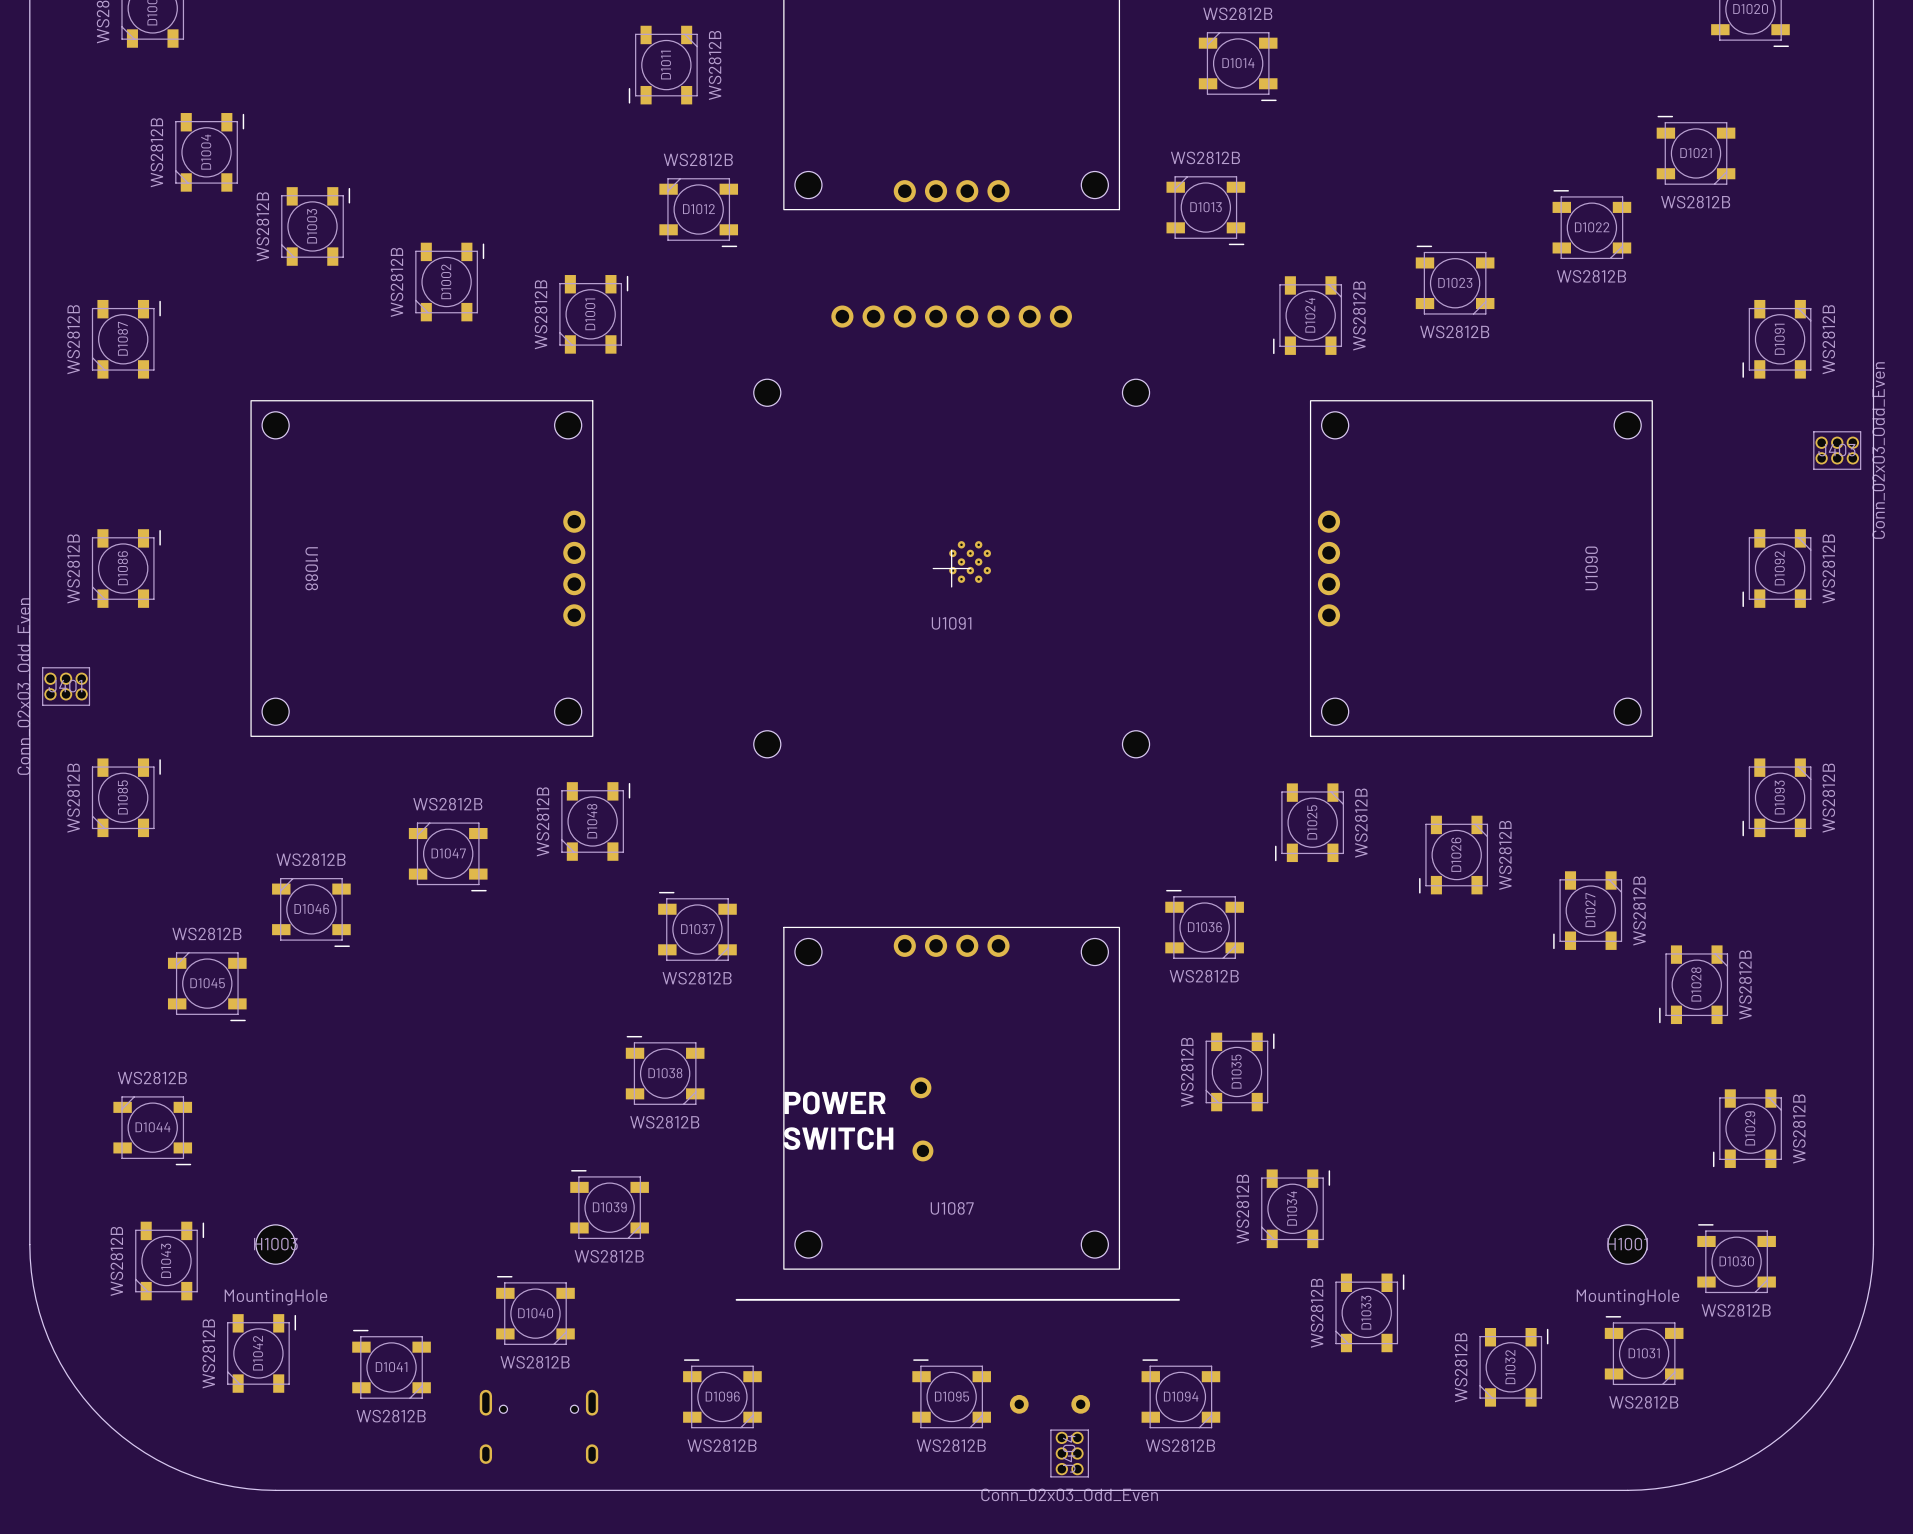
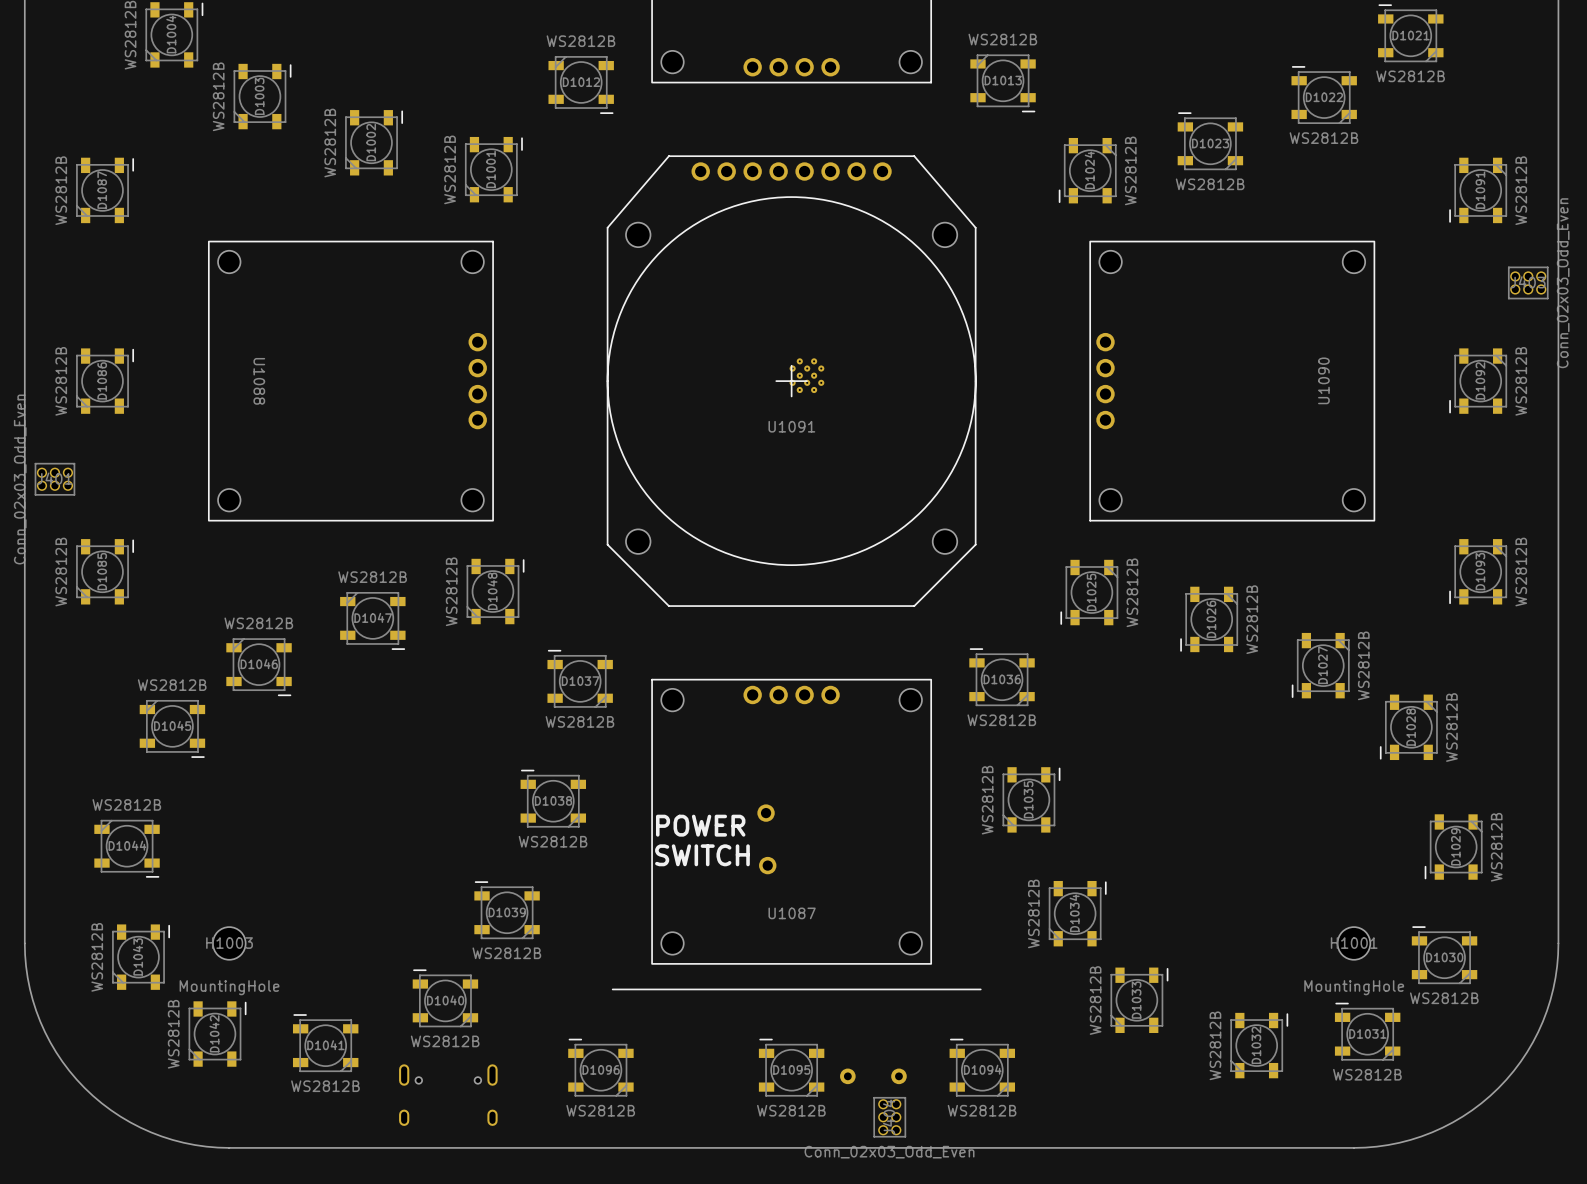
U1091 footprint: [753, 305, 1150, 758] -> [607, 155, 977, 607]

